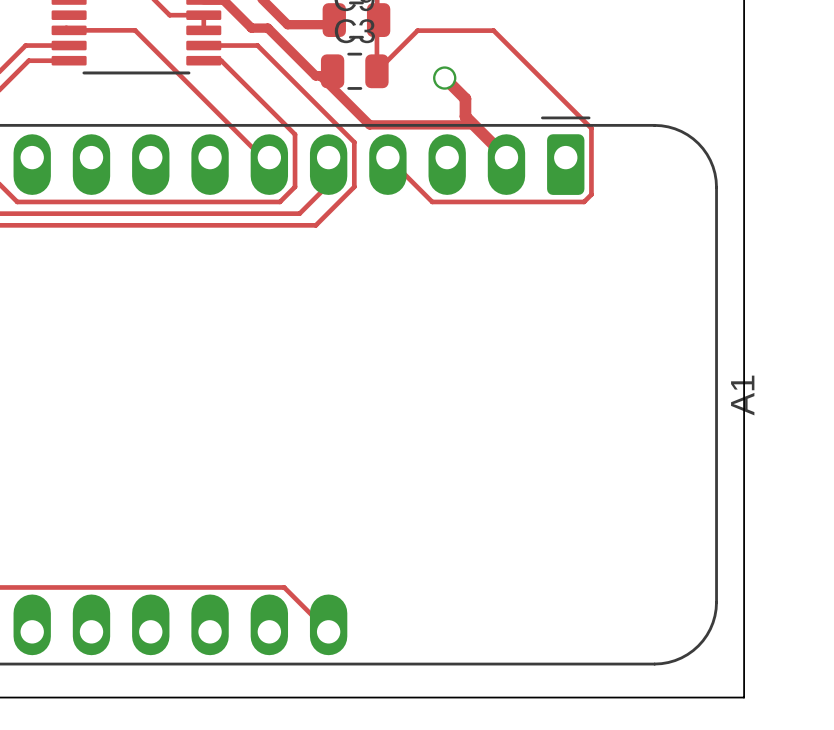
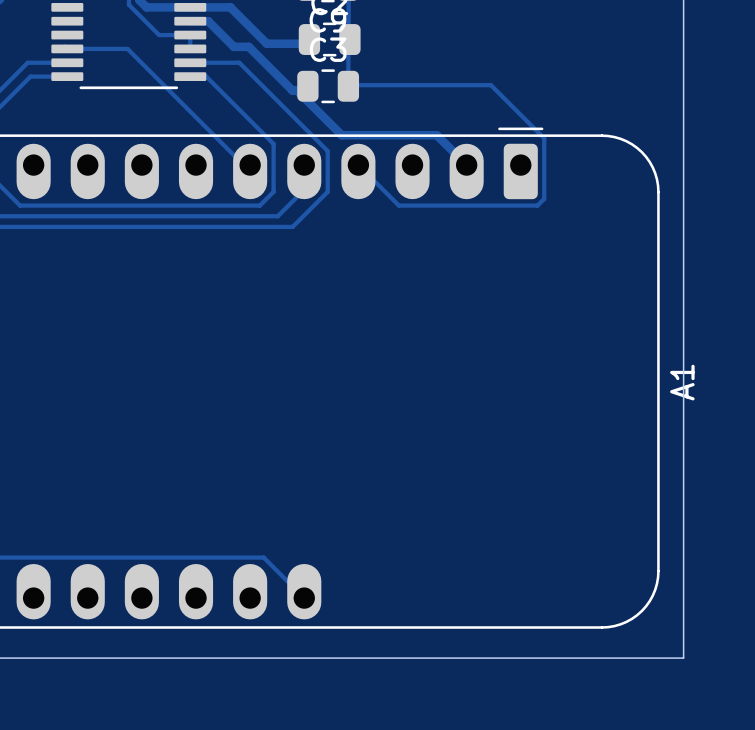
track: (378, 70) (417, 30) (493, 30) (533, 70) -> (349, 85) (490, 85)
track: (444, 78) (465, 98) (465, 116) (506, 157) -> none
via: (444, 78) -> none

